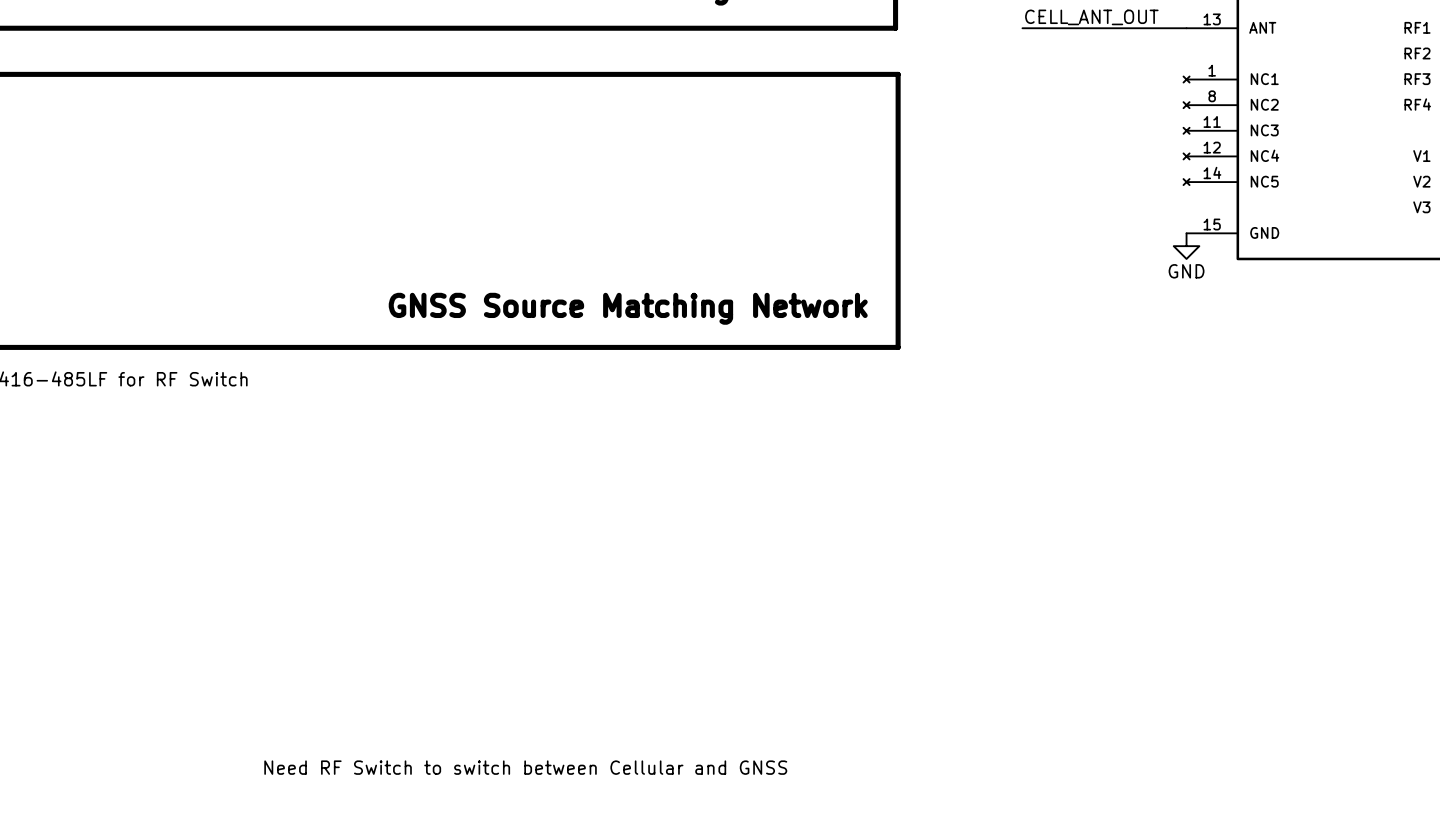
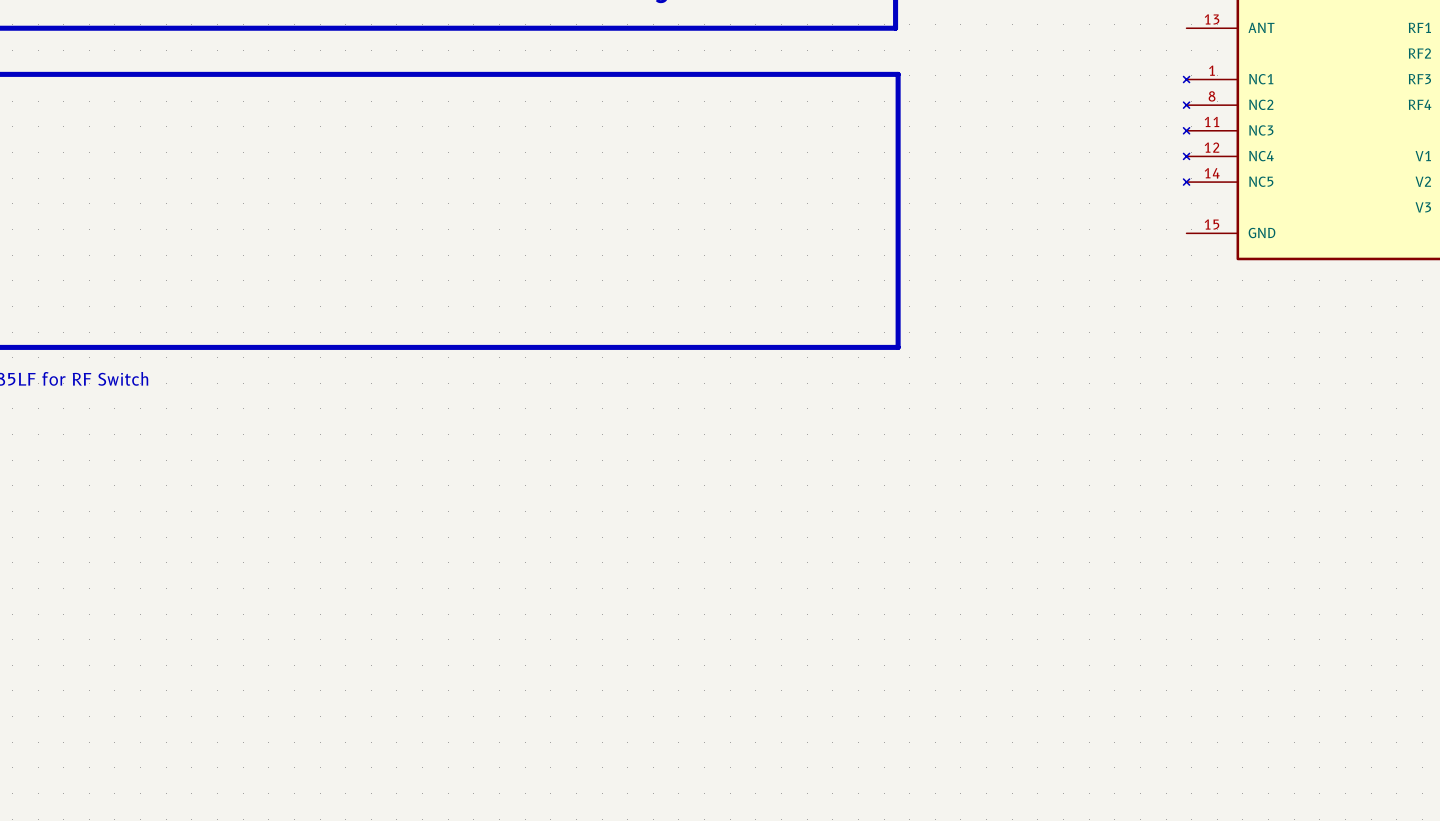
label: CELL_ANT_OUT (1091, 17) -> none
wire: (1022, 28) (1186, 28) -> none
power symbol: GND (1186, 246) -> none
text: GNSS Source Matching Network (628, 308) -> none
text: Need RF Switch to switch between Cellular and GNSS (525, 767) -> none

